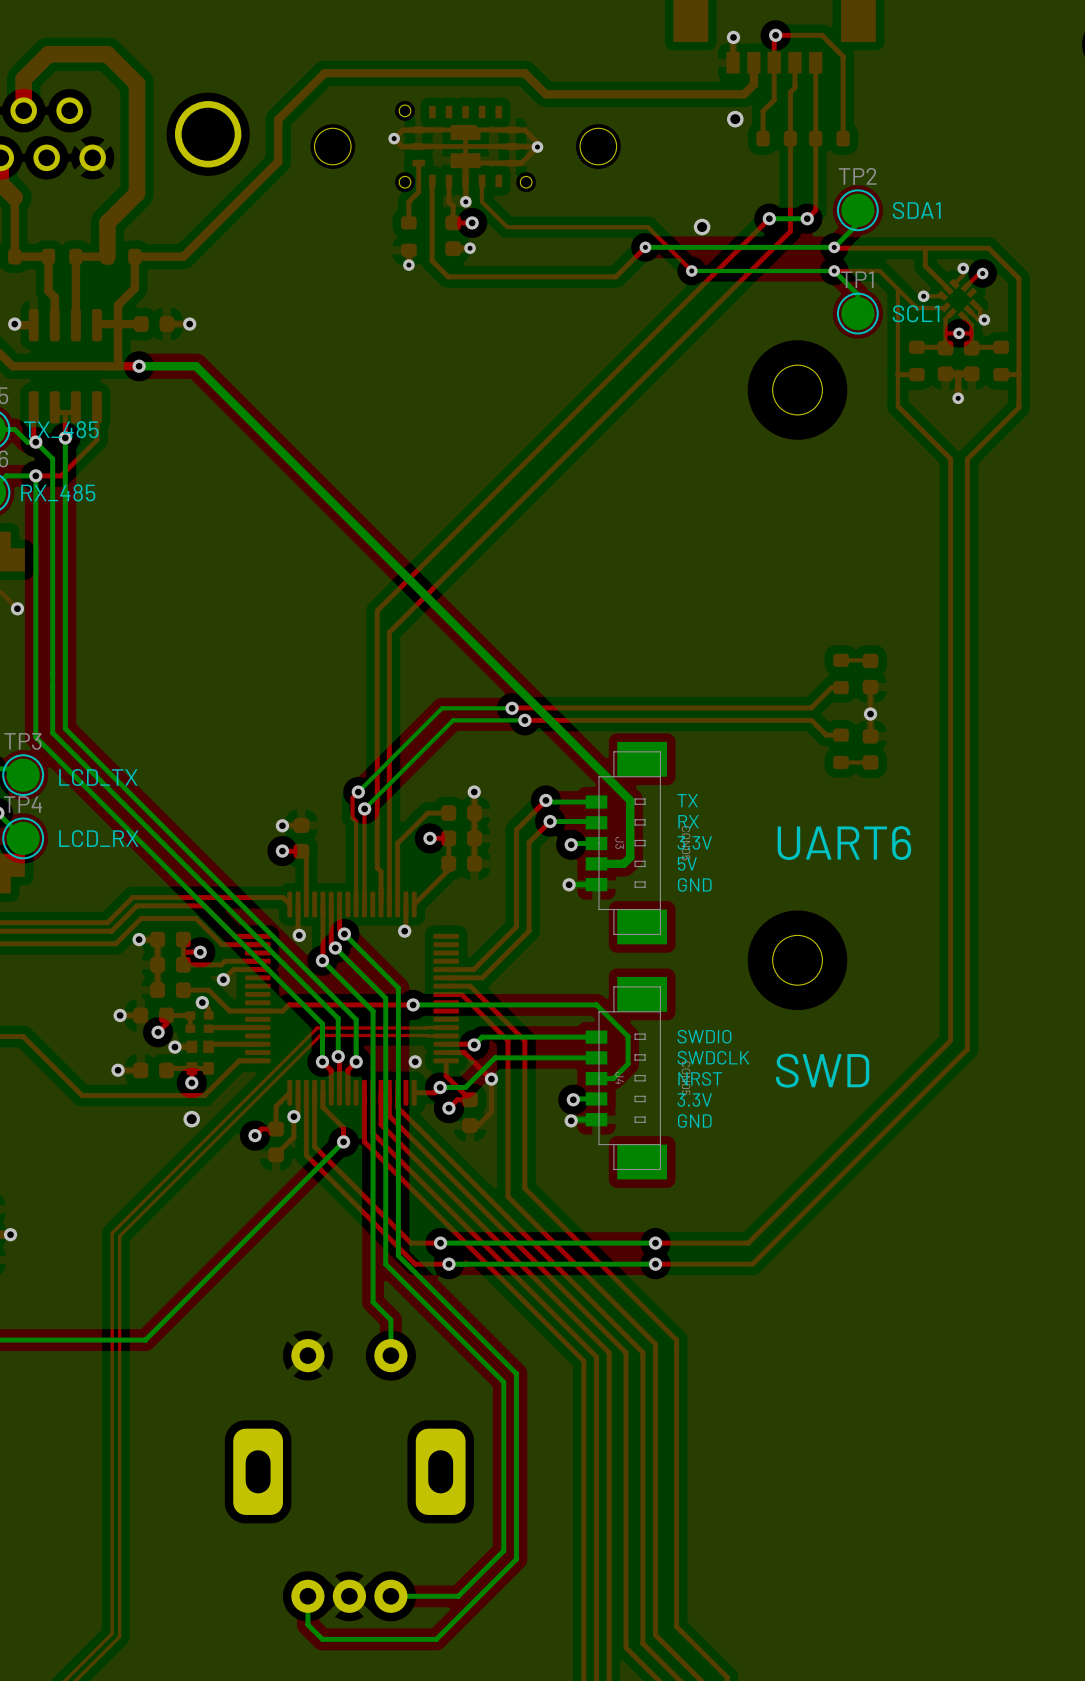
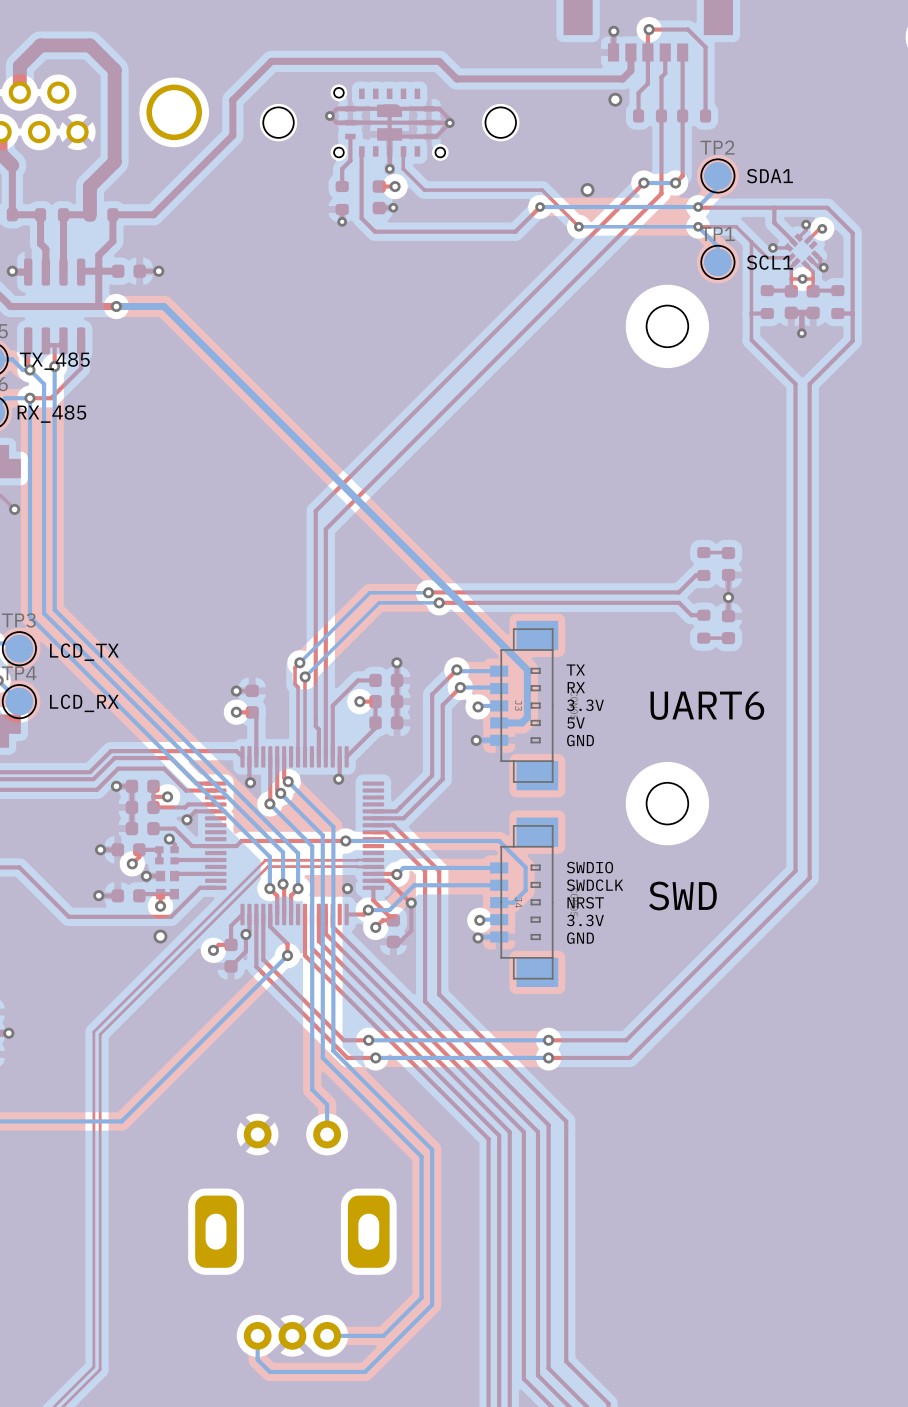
top track: (448, 180) (448, 201) (453, 206) (453, 222) -> none

